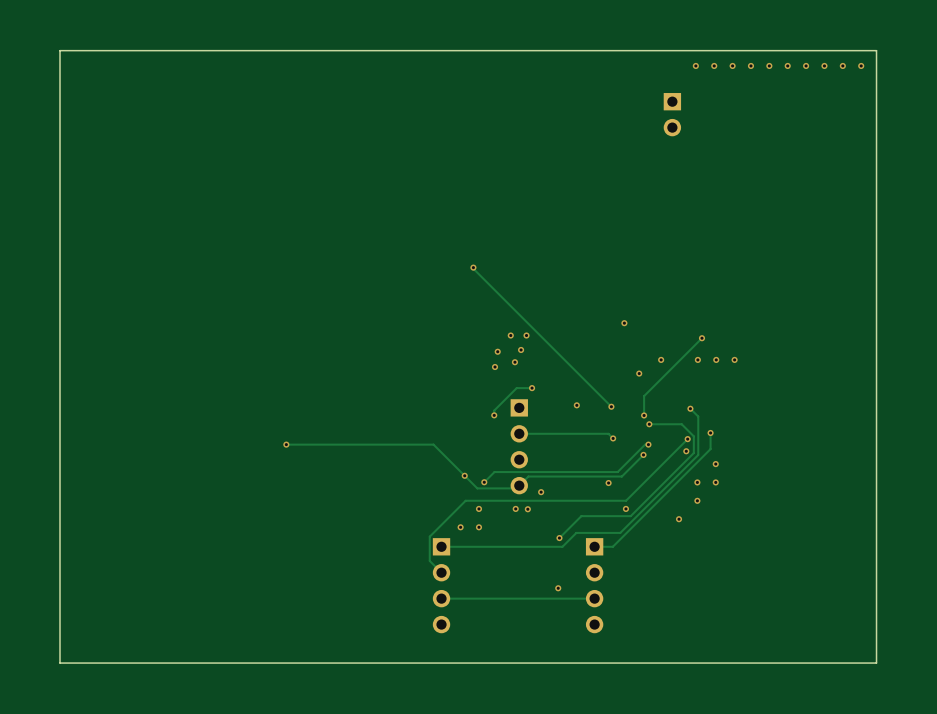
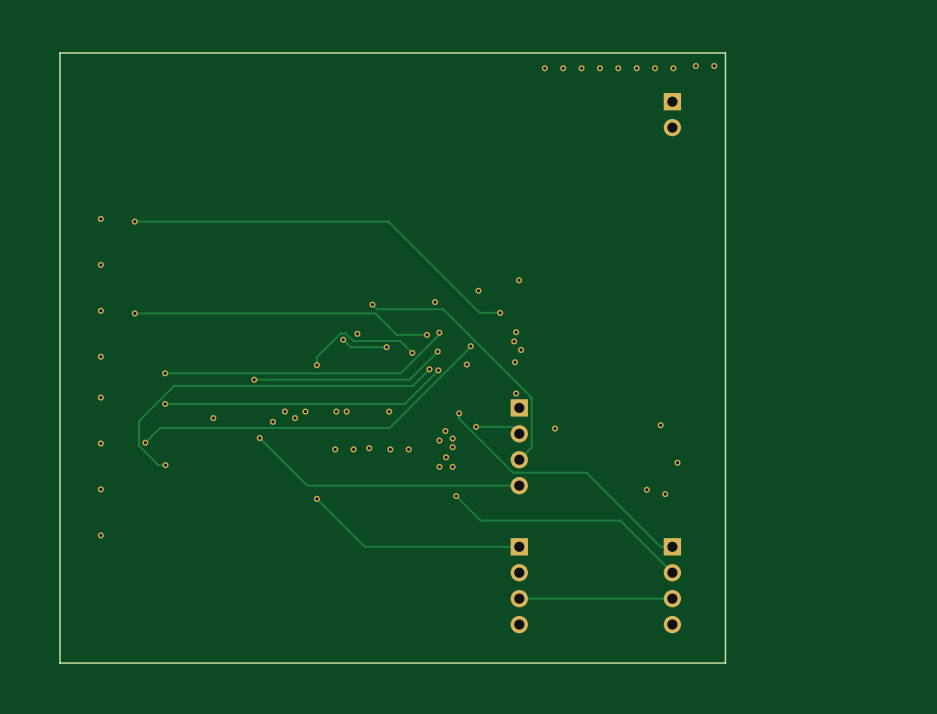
board edge: (59, 53) (59, 50) (876, 50) (876, 663) (725, 663) -> (59, 53) (725, 53) (725, 663)
via: (732, 65) -> none
via: (750, 65) -> none
via: (769, 65) -> none
via: (787, 65) -> none
via: (806, 65) -> none
via: (824, 65) -> none
via: (842, 65) -> none
via: (861, 65) -> none
via: none -> (544, 68)
via: none -> (563, 68)
via: none -> (581, 68)
via: none -> (599, 68)
via: none -> (618, 68)
via: none -> (636, 68)
via: none -> (655, 68)
via: none -> (673, 68)
via: none -> (100, 218)
track: none -> (134, 221) (388, 221) (479, 312) (500, 312)
via: none -> (134, 221)
via: none -> (100, 264)
track: (473, 267) (611, 406) -> none
via: (473, 267) -> none
via: none -> (519, 280)
via: none -> (478, 290)
via: none -> (435, 302)
track: none -> (372, 304) (377, 309) (443, 309) (531, 397) (531, 447) (519, 459)
via: none -> (372, 304)
via: none -> (100, 310)
via: none -> (500, 312)
track: none -> (134, 313) (375, 313) (396, 334) (426, 334)
via: none -> (134, 313)
via: (624, 323) -> none
track: none -> (439, 332) (400, 373) (165, 373)
via: none -> (439, 332)
via: none -> (516, 332)
via: none -> (357, 333)
via: none -> (426, 334)
via: (510, 335) -> none
via: (526, 335) -> none
track: (701, 338) (644, 396) (644, 415) -> none
via: (701, 338) -> none
track: none -> (343, 339) (350, 347) (386, 347)
via: none -> (343, 339)
via: none -> (514, 341)
track: none -> (470, 346) (389, 427) (160, 427) (145, 442)
via: none -> (470, 346)
via: none -> (386, 347)
track: none -> (437, 351) (409, 379) (254, 379)
via: none -> (437, 351)
via: (497, 351) -> none
track: none -> (412, 353) (400, 340) (353, 340) (345, 333) (340, 333) (316, 357) (316, 365)
via: none -> (412, 353)
via: none -> (100, 356)
via: (661, 359) -> none
via: (697, 359) -> none
via: (716, 359) -> none
via: (734, 359) -> none
via: none -> (466, 364)
via: none -> (316, 365)
via: (495, 367) -> none
track: none -> (429, 369) (412, 385) (174, 385) (139, 421) (139, 445) (158, 465) (165, 465)
via: none -> (429, 369)
track: none -> (438, 370) (404, 403) (165, 403)
via: none -> (438, 370)
via: none -> (165, 373)
via: (639, 373) -> none
via: none -> (254, 379)
track: (532, 388) (516, 388) (494, 410) (494, 415) -> none
via: (532, 388) -> none
via: none -> (516, 393)
via: none -> (100, 397)
via: none -> (165, 403)
via: (576, 405) -> none
via: (611, 406) -> none
track: (690, 408) (698, 416) (698, 454) (620, 532) (576, 532) (562, 546) (519, 546) -> none
via: (690, 408) -> none
via: none -> (284, 411)
via: none -> (305, 411)
via: none -> (336, 411)
via: none -> (346, 411)
via: none -> (389, 411)
track: none -> (459, 413) (459, 418) (513, 472) (586, 472) (660, 546) (672, 546)
via: none -> (459, 413)
via: (494, 415) -> none
via: (644, 415) -> none
via: none -> (213, 418)
via: none -> (295, 418)
via: none -> (272, 421)
track: (649, 424) (681, 424) (693, 436) (693, 453) (630, 516) (581, 516) (559, 538) -> none
via: (649, 424) -> none
via: none -> (660, 425)
via: none -> (476, 426)
via: none -> (555, 428)
via: none -> (445, 431)
track: (710, 432) (710, 449) (612, 546) (594, 546) -> none
via: (710, 432) -> none
track: (519, 433) (608, 433) (613, 438) -> (519, 433) (512, 426) (476, 426)
track: none -> (259, 438) (307, 485) (519, 485)
via: none -> (259, 438)
via: none -> (452, 438)
via: (613, 438) -> none
track: (687, 439) (626, 500) (465, 500) (429, 536) (429, 560) (441, 572) -> none
via: (687, 439) -> none
via: none -> (439, 440)
via: none -> (145, 442)
via: none -> (100, 443)
track: (286, 444) (433, 444) (477, 488) (516, 488) (528, 476) (621, 476) (643, 454) -> none
via: (286, 444) -> none
track: (648, 444) (645, 444) (617, 472) (494, 472) (484, 482) -> none
via: (648, 444) -> none
via: none -> (452, 447)
via: none -> (369, 448)
via: none -> (335, 449)
via: none -> (353, 449)
via: none -> (390, 449)
via: none -> (408, 449)
via: (686, 451) -> none
via: (643, 454) -> none
via: none -> (446, 457)
via: none -> (677, 462)
via: (715, 464) -> none
via: none -> (165, 465)
via: none -> (439, 466)
via: none -> (452, 466)
via: (464, 475) -> none
via: (484, 482) -> none
via: (697, 482) -> none
via: (715, 482) -> none
via: (608, 483) -> none
via: none -> (100, 489)
via: none -> (646, 489)
via: (541, 492) -> none
via: none -> (665, 494)
track: none -> (456, 496) (480, 520) (620, 520) (672, 572)
via: none -> (456, 496)
track: none -> (316, 498) (364, 546) (441, 546)
via: none -> (316, 498)
via: (697, 500) -> none
via: (478, 508) -> none
via: (515, 508) -> none
via: (625, 508) -> none
via: (527, 509) -> none
via: (679, 519) -> none
via: (460, 527) -> none
via: (478, 527) -> none
via: none -> (100, 535)
via: (559, 538) -> none
part: (441, 585) -> none
part: none -> (519, 585)
part: (594, 585) -> none
part: none -> (672, 585)
via: (558, 588) -> none
track: (519, 598) (441, 598) -> (672, 598) (594, 598)

